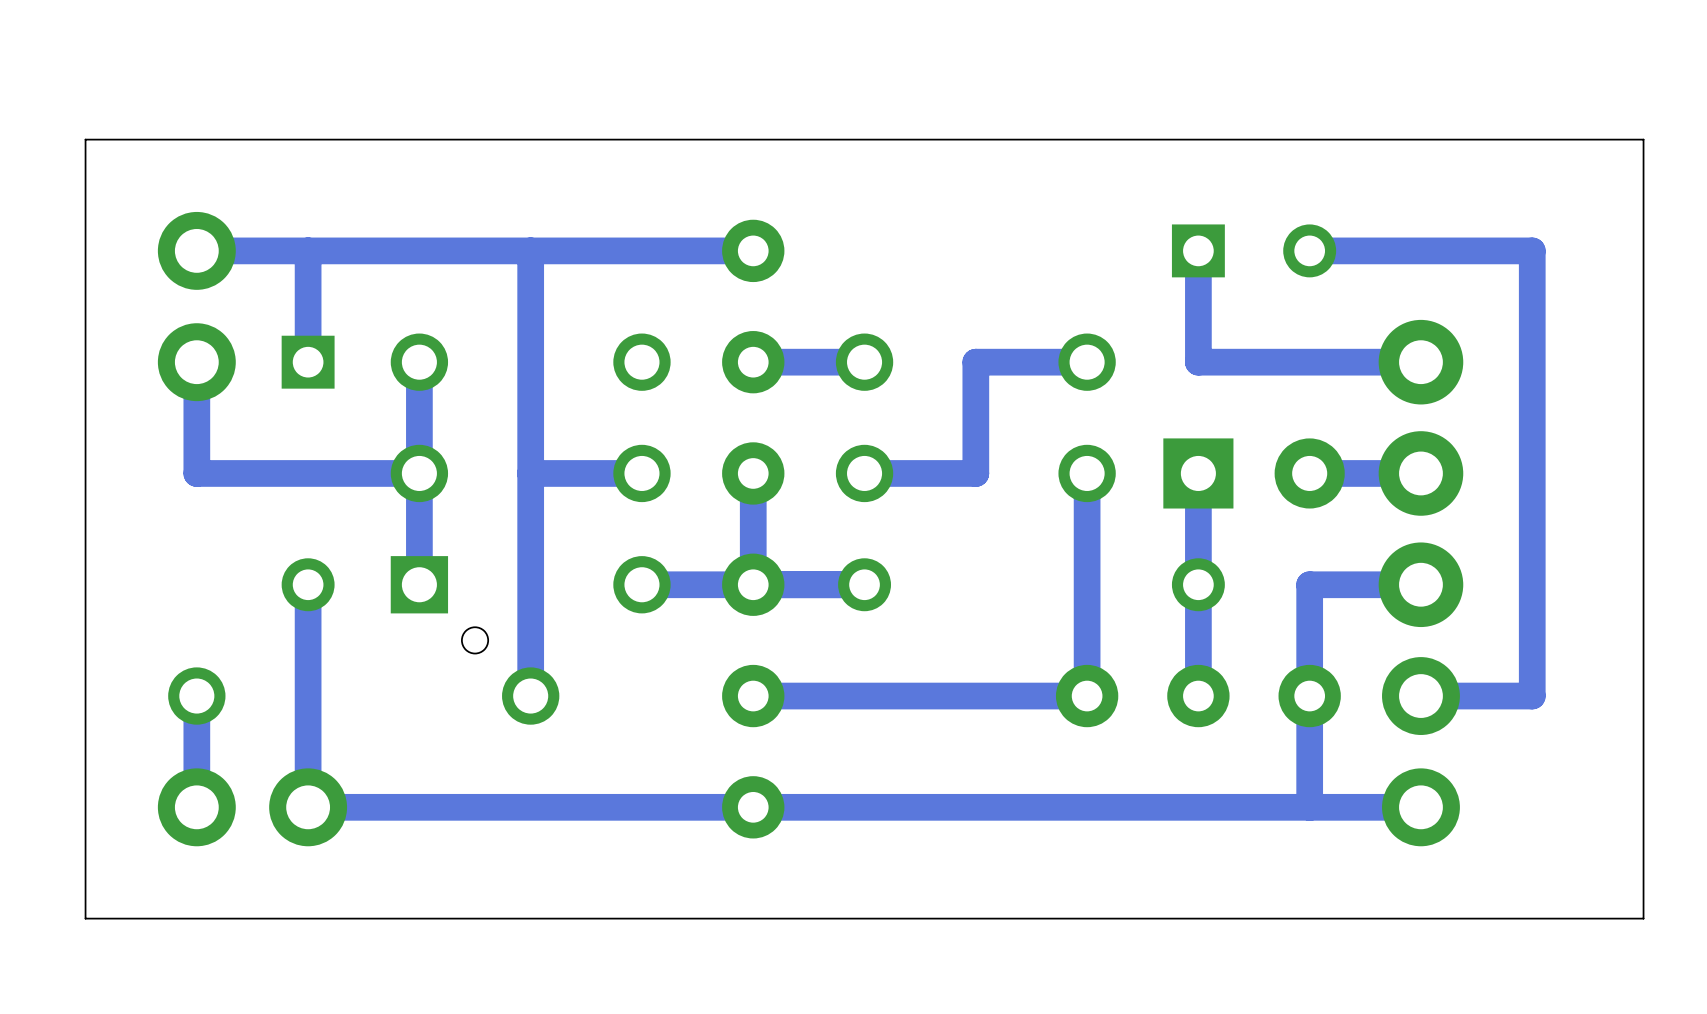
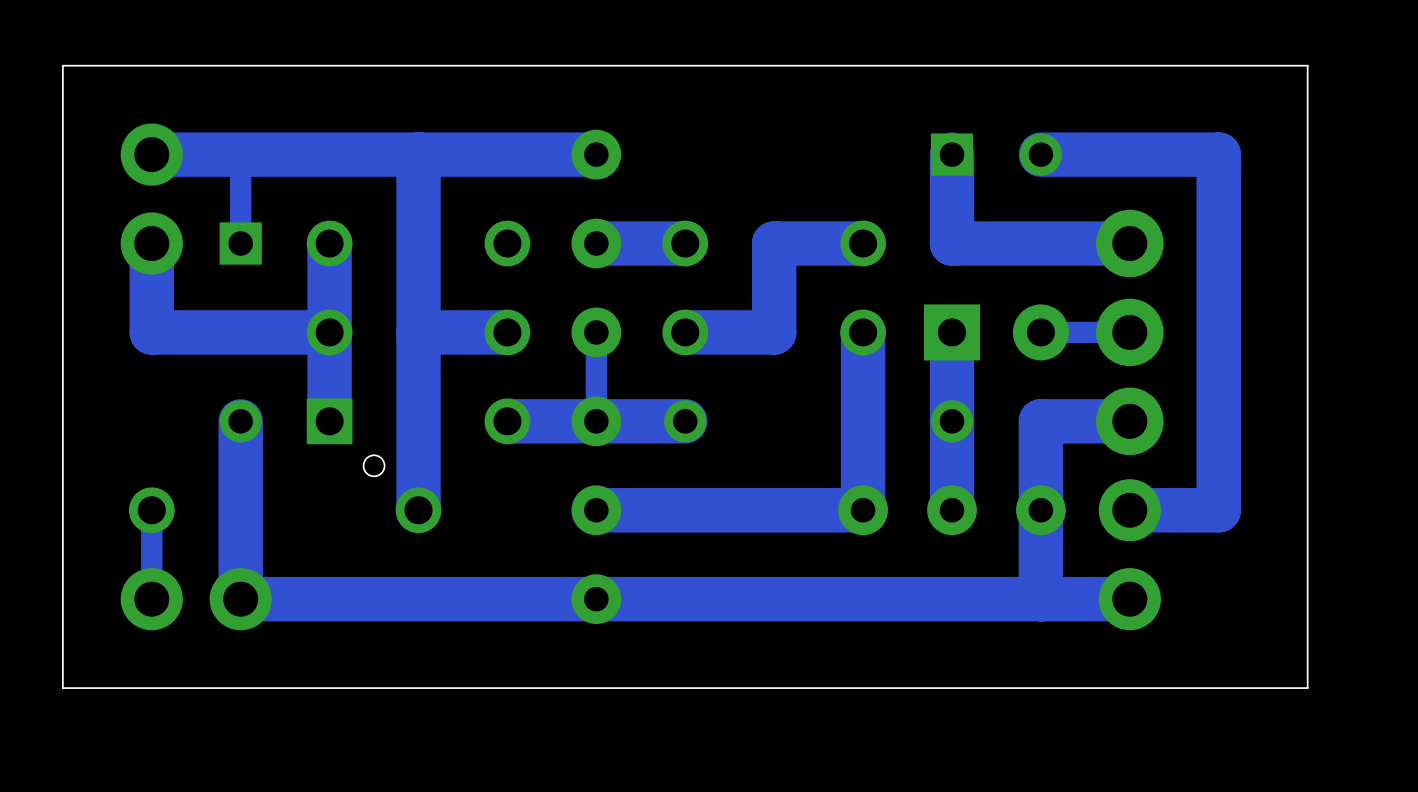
track width: thin (530, 250) (530, 696) -> thick (418, 154) (418, 510)
track width: thin (753, 250) (196, 250) -> thick (596, 154) (151, 154)
track width: thin (1198, 250) (1198, 362) (1420, 362) -> thick (952, 154) (952, 243) (1129, 243)
track width: thin (1309, 250) (1532, 250) (1532, 696) (1420, 696) -> thick (1040, 154) (1218, 154) (1218, 510) (1129, 510)
track width: thin (196, 362) (196, 473) (419, 473) -> thick (151, 243) (151, 332) (329, 332)
track width: thin (419, 362) (419, 584) -> thick (329, 243) (329, 421)
track width: thin (864, 362) (753, 362) -> thick (685, 243) (596, 243)
track width: thin (1087, 362) (975, 362) (975, 473) (864, 473) -> thick (863, 243) (774, 243) (774, 332) (685, 332)
track width: thin (641, 473) (530, 473) -> thick (507, 332) (418, 332)
track width: thin (1087, 473) (1087, 696) (753, 696) -> thick (863, 332) (863, 510) (596, 510)
track width: thin (1198, 473) (1198, 696) -> thick (952, 332) (952, 510)
track width: thin (308, 584) (308, 807) (1420, 807) -> thick (240, 421) (240, 599) (1129, 599)
track width: thin (864, 584) (641, 584) -> thick (685, 421) (507, 421)
track width: thin (1420, 584) (1309, 584) (1309, 807) -> thick (1129, 421) (1040, 421) (1040, 599)

